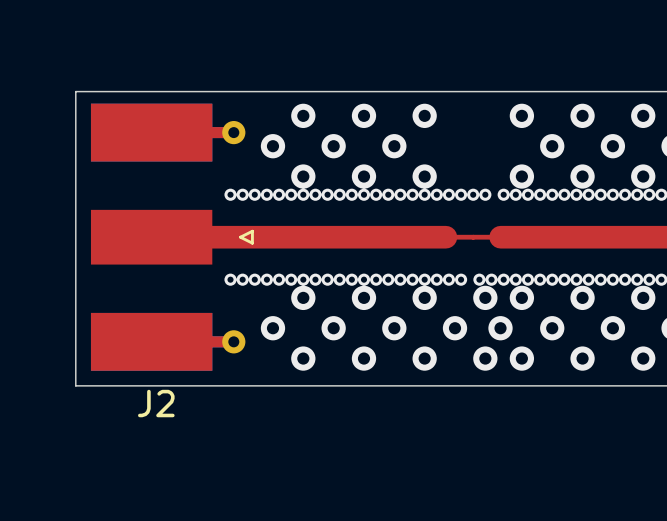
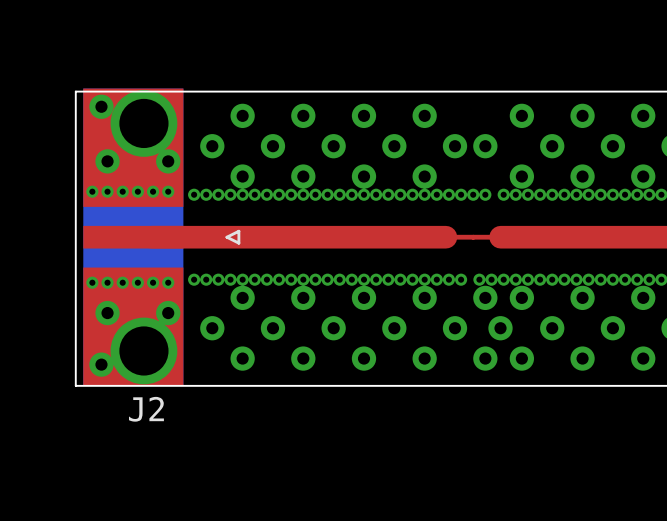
J2 footprint: [90, 103, 254, 371] -> [83, 88, 241, 386]
via: none -> (242, 115)
via: none -> (212, 146)
via: none -> (455, 146)
via: none -> (485, 146)
via: none -> (242, 176)
via: none -> (194, 194)
via: none -> (206, 194)
via: none -> (218, 194)
via: none -> (194, 279)
via: none -> (206, 279)
via: none -> (218, 279)
via: none -> (242, 297)
via: none -> (212, 328)
via: none -> (242, 358)

